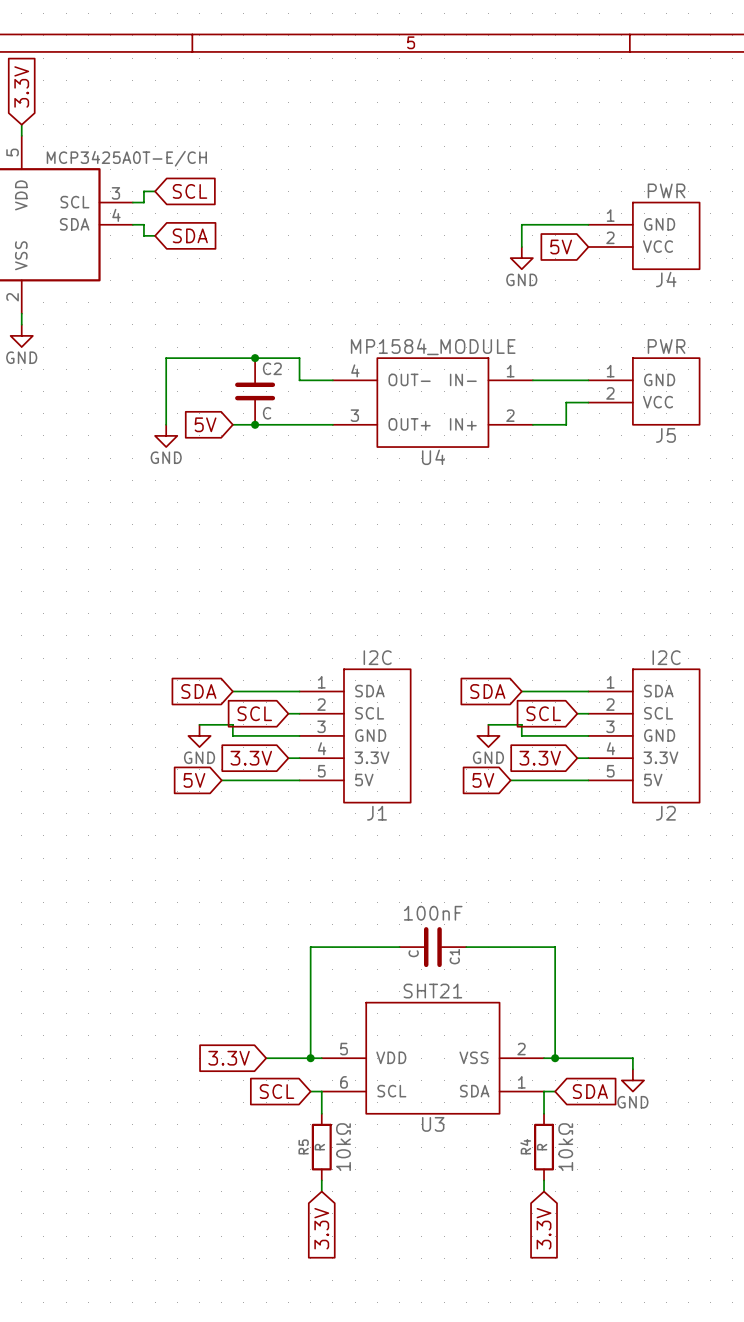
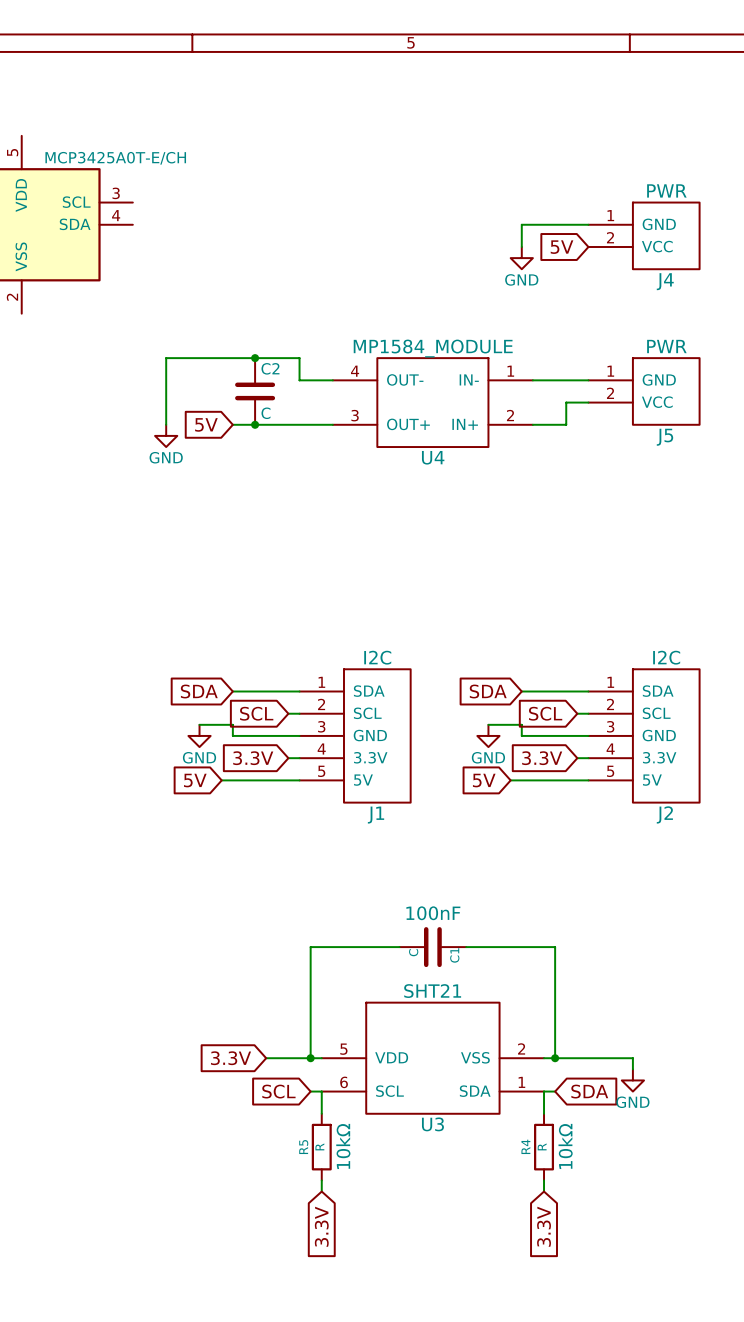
global label: 3.3V (21, 86) -> none
wire: (21, 124) (21, 135) -> none
wire: (155, 191) (143, 191) (143, 202) (132, 202) -> none
global label: SCL (190, 191) -> none
wire: (132, 224) (143, 224) (143, 235) (155, 235) -> none
global label: SDA (190, 235) -> none
wire: (21, 313) (21, 324) -> none
power symbol: GND (21, 335) -> none

